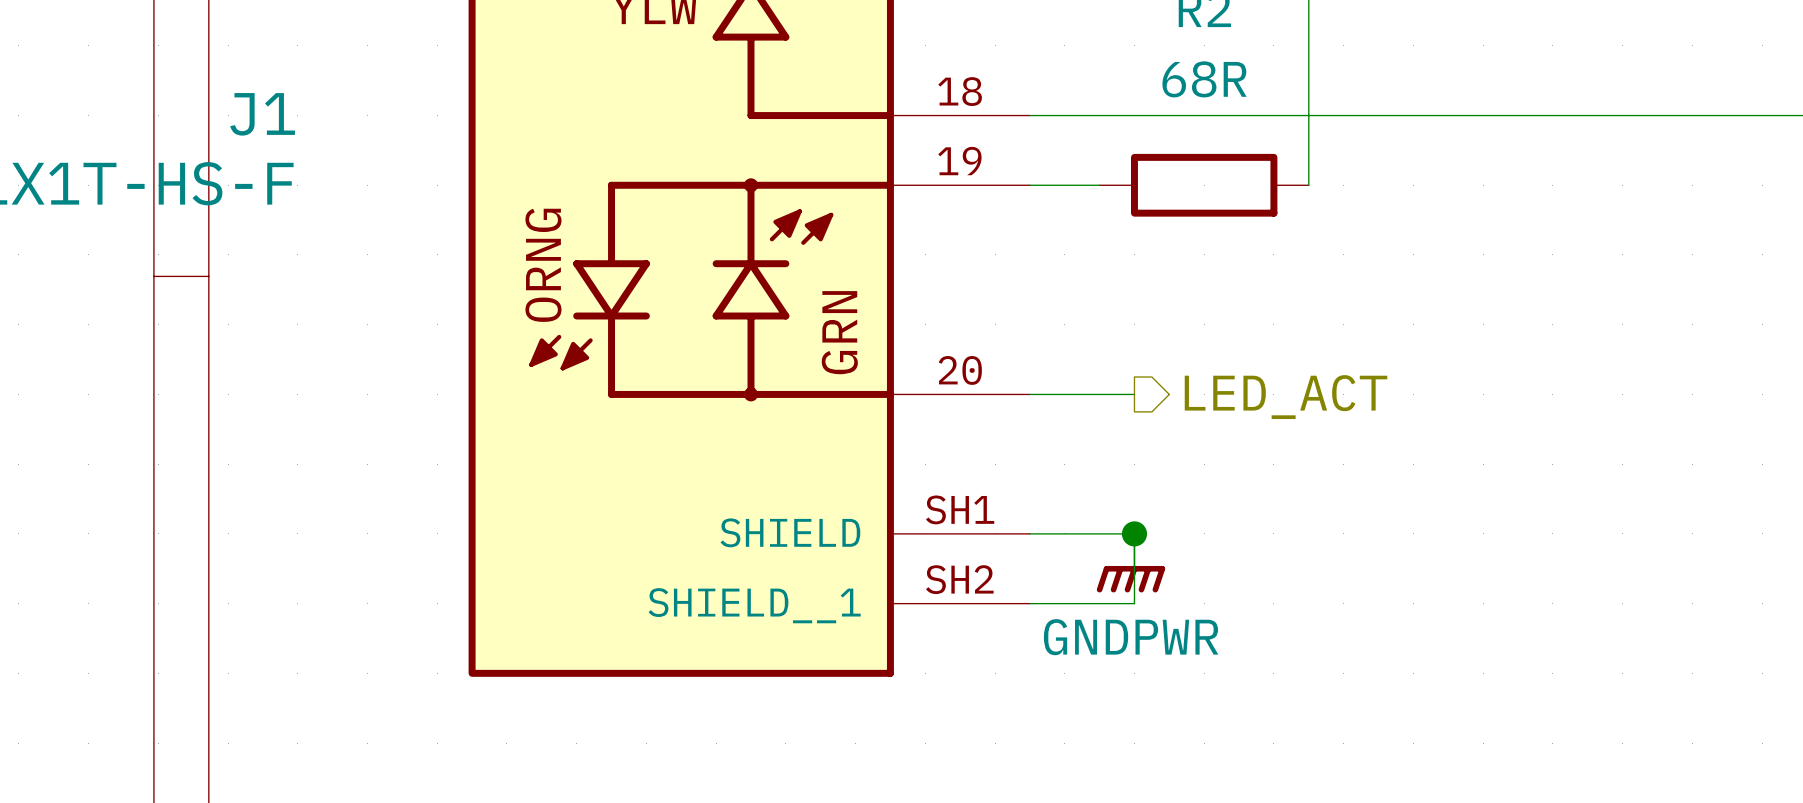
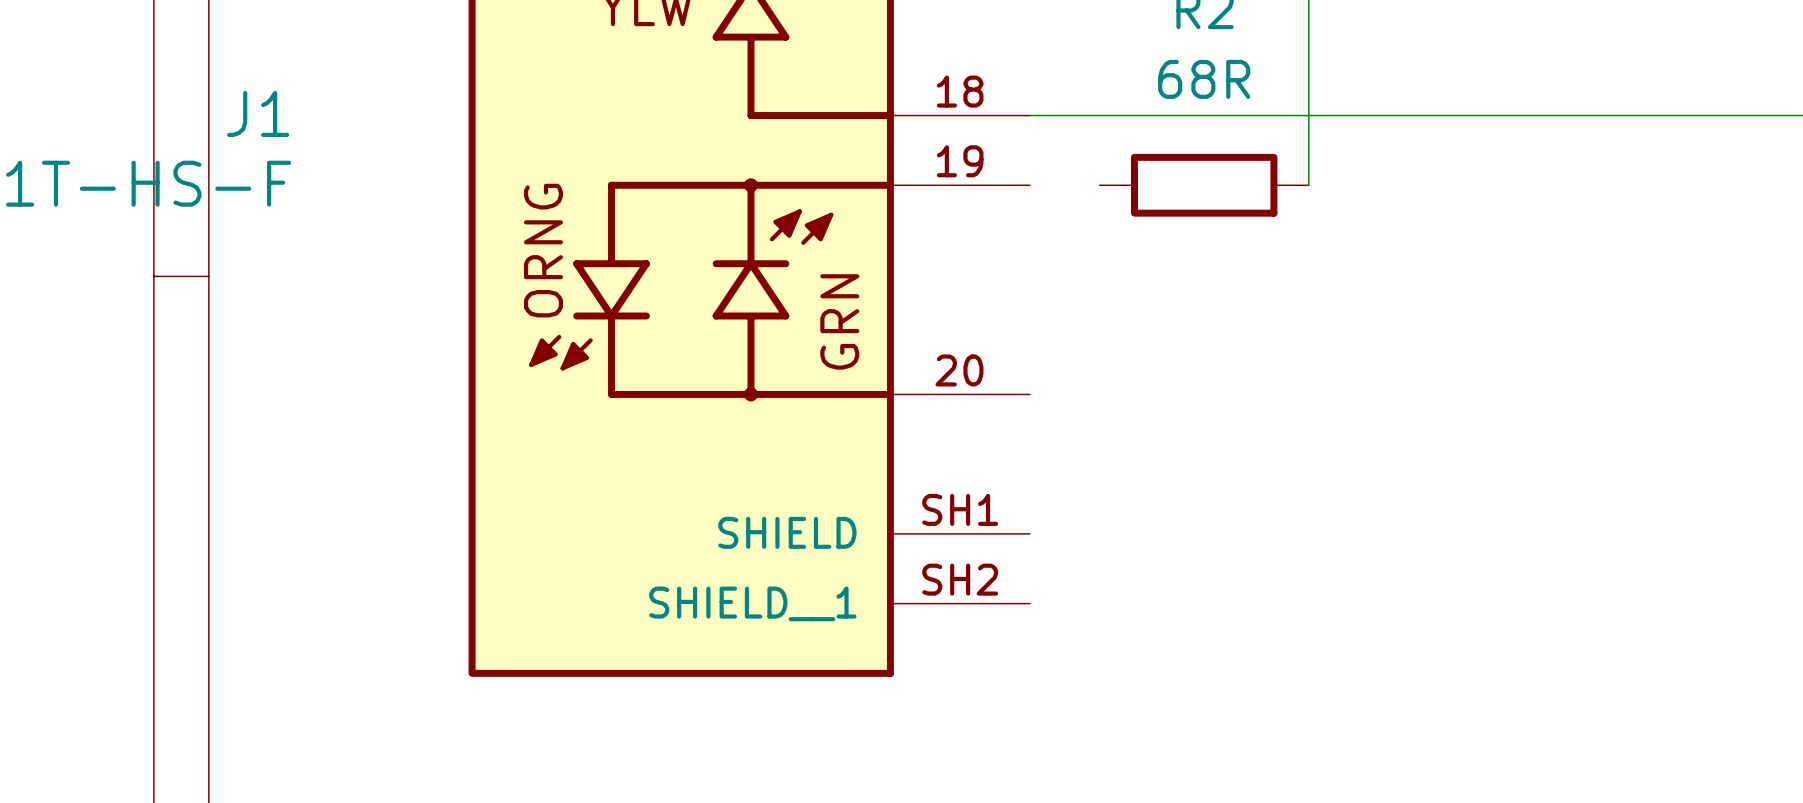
wire: (1029, 185) (1099, 185) -> none
wire: (1029, 394) (1134, 394) -> none
hierarchical label: LED_ACT (1286, 397) -> none
wire: (1029, 533) (1134, 533) (1134, 603) (1029, 603) -> none
junction: (1134, 533) -> none
power symbol: GNDPWR (1130, 563) -> none

